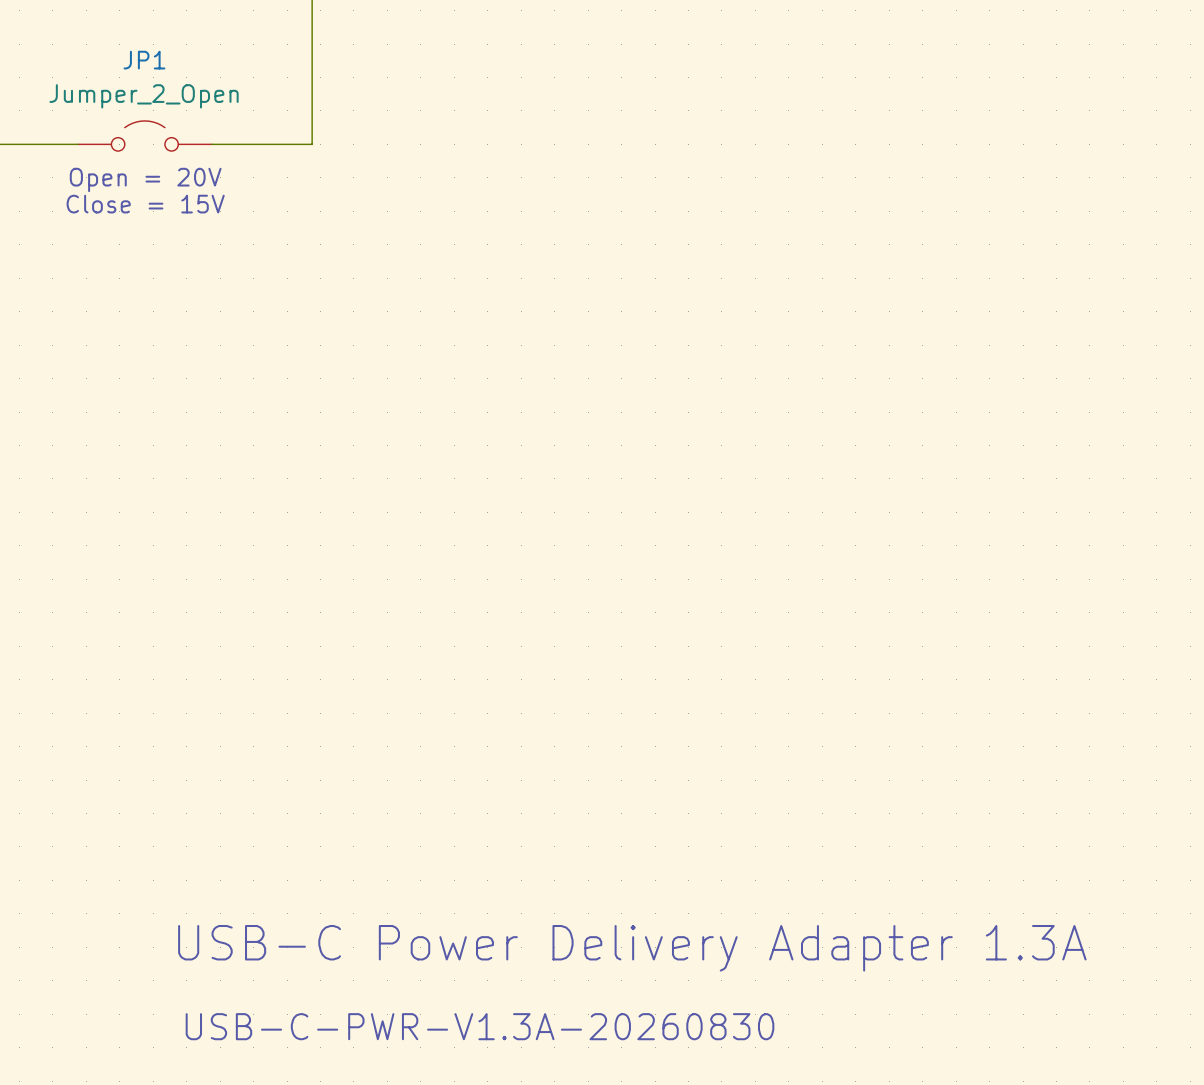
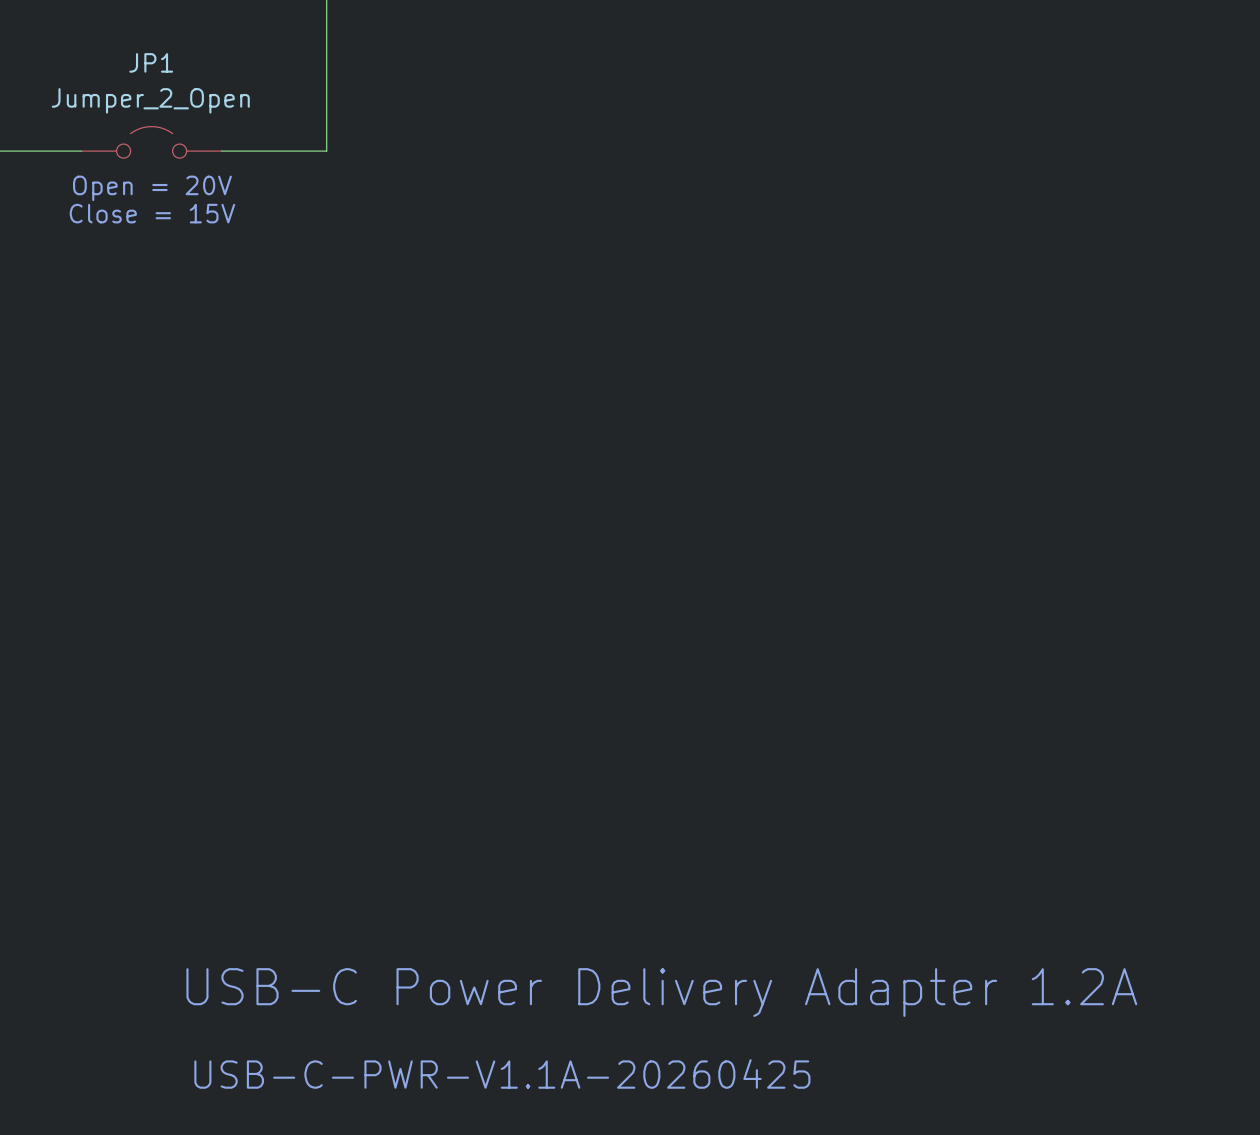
text: USB-C Power Delivery Adapter 1.3A (632, 948) -> USB-C Power Delivery Adapter 1.2A (661, 992)
text: USB-C-PWR-V1.3A-20260830 (480, 1026) -> USB-C-PWR-V1.1A-20260425 (502, 1073)

